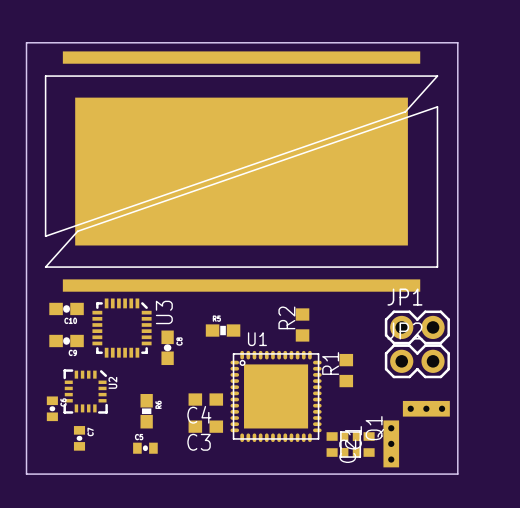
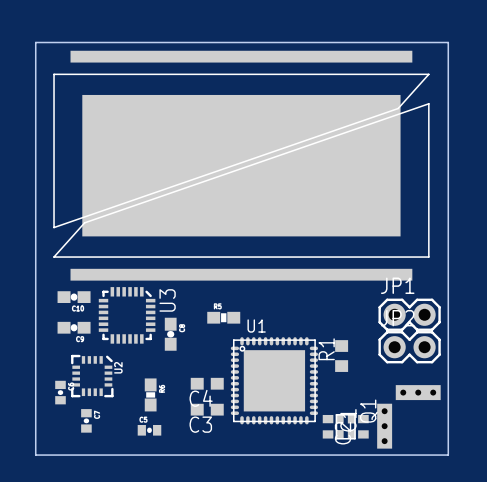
R2: (302, 324) -> none

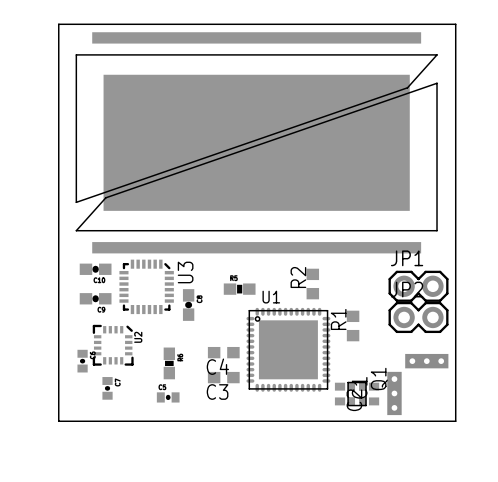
R2: none -> (312, 284)

